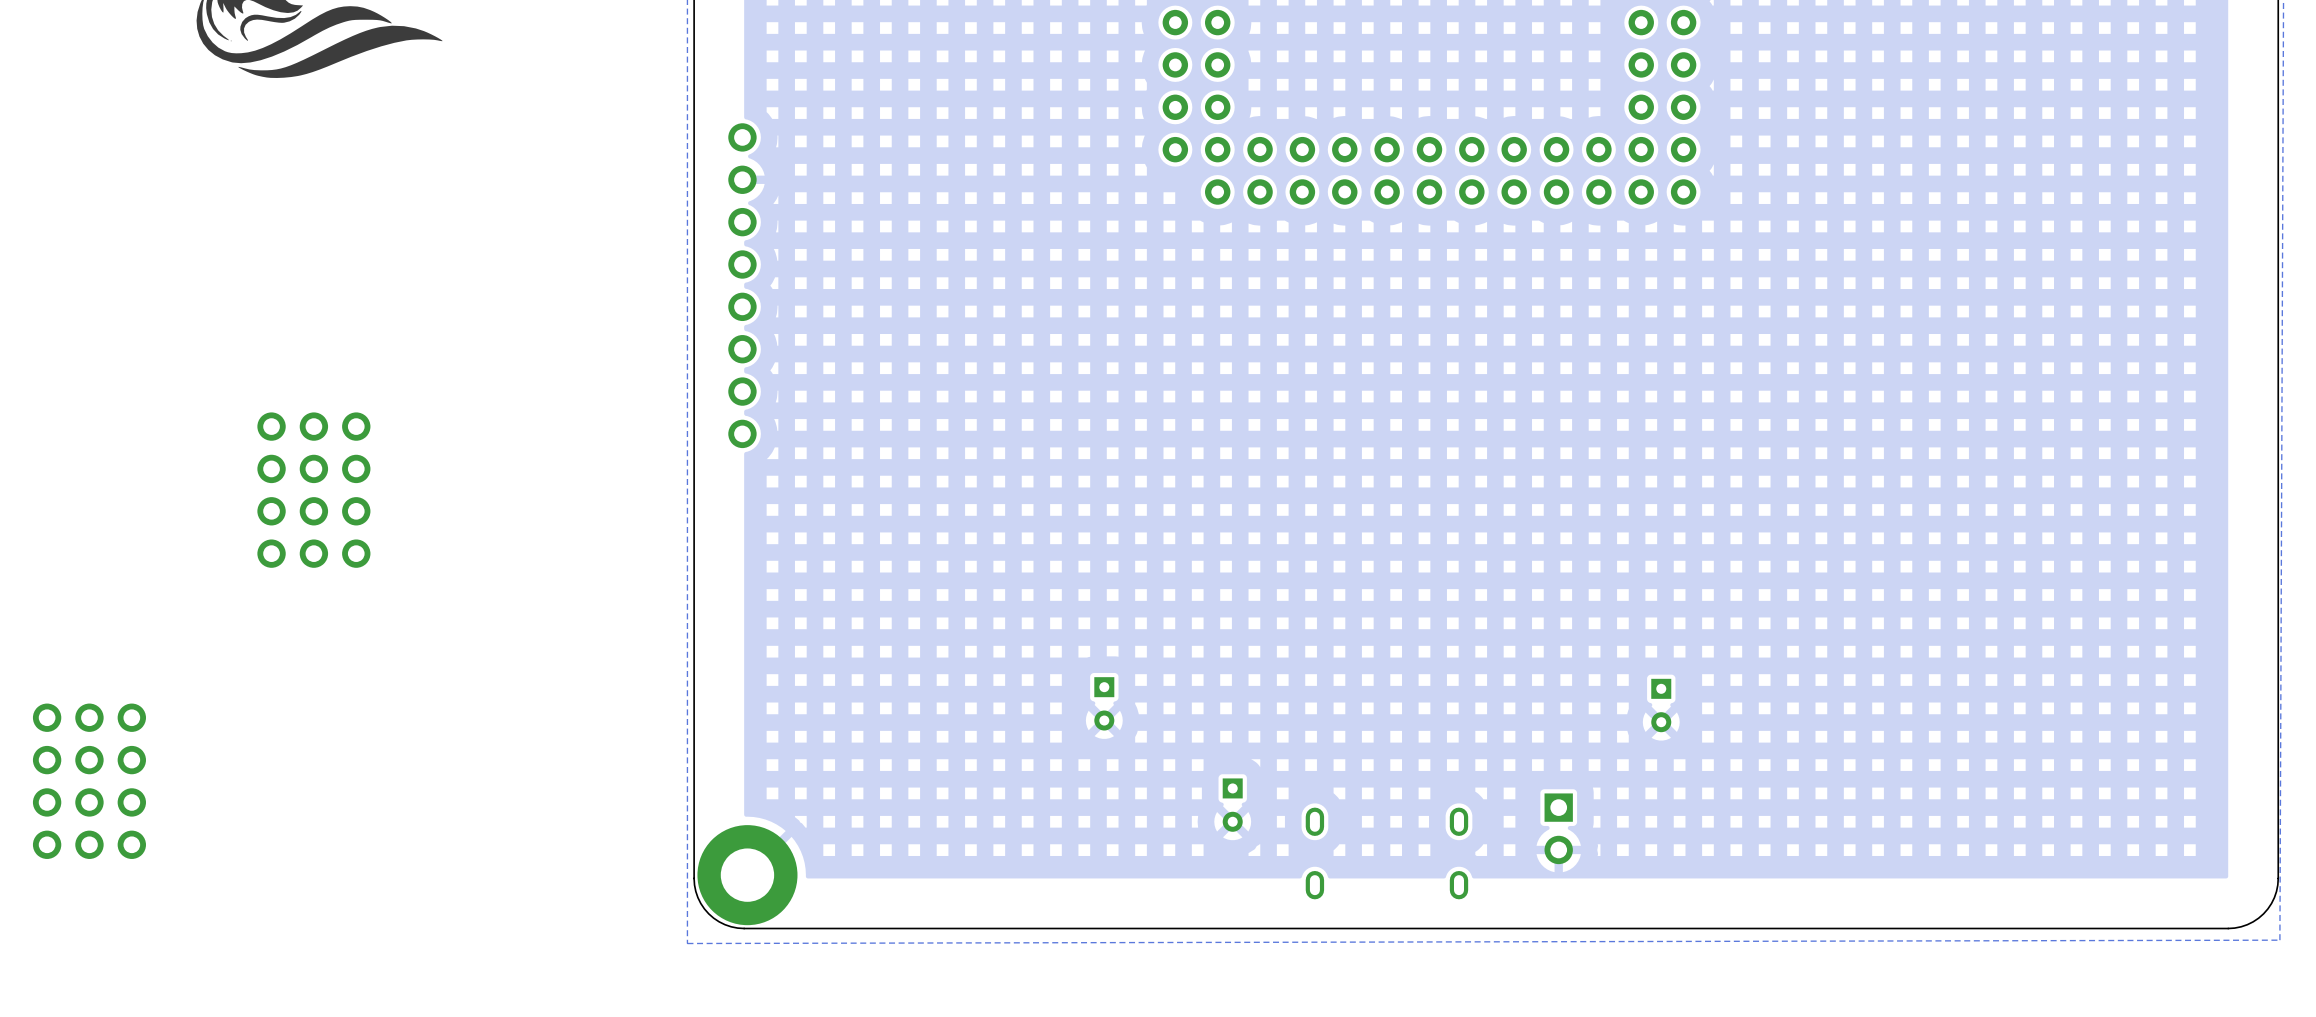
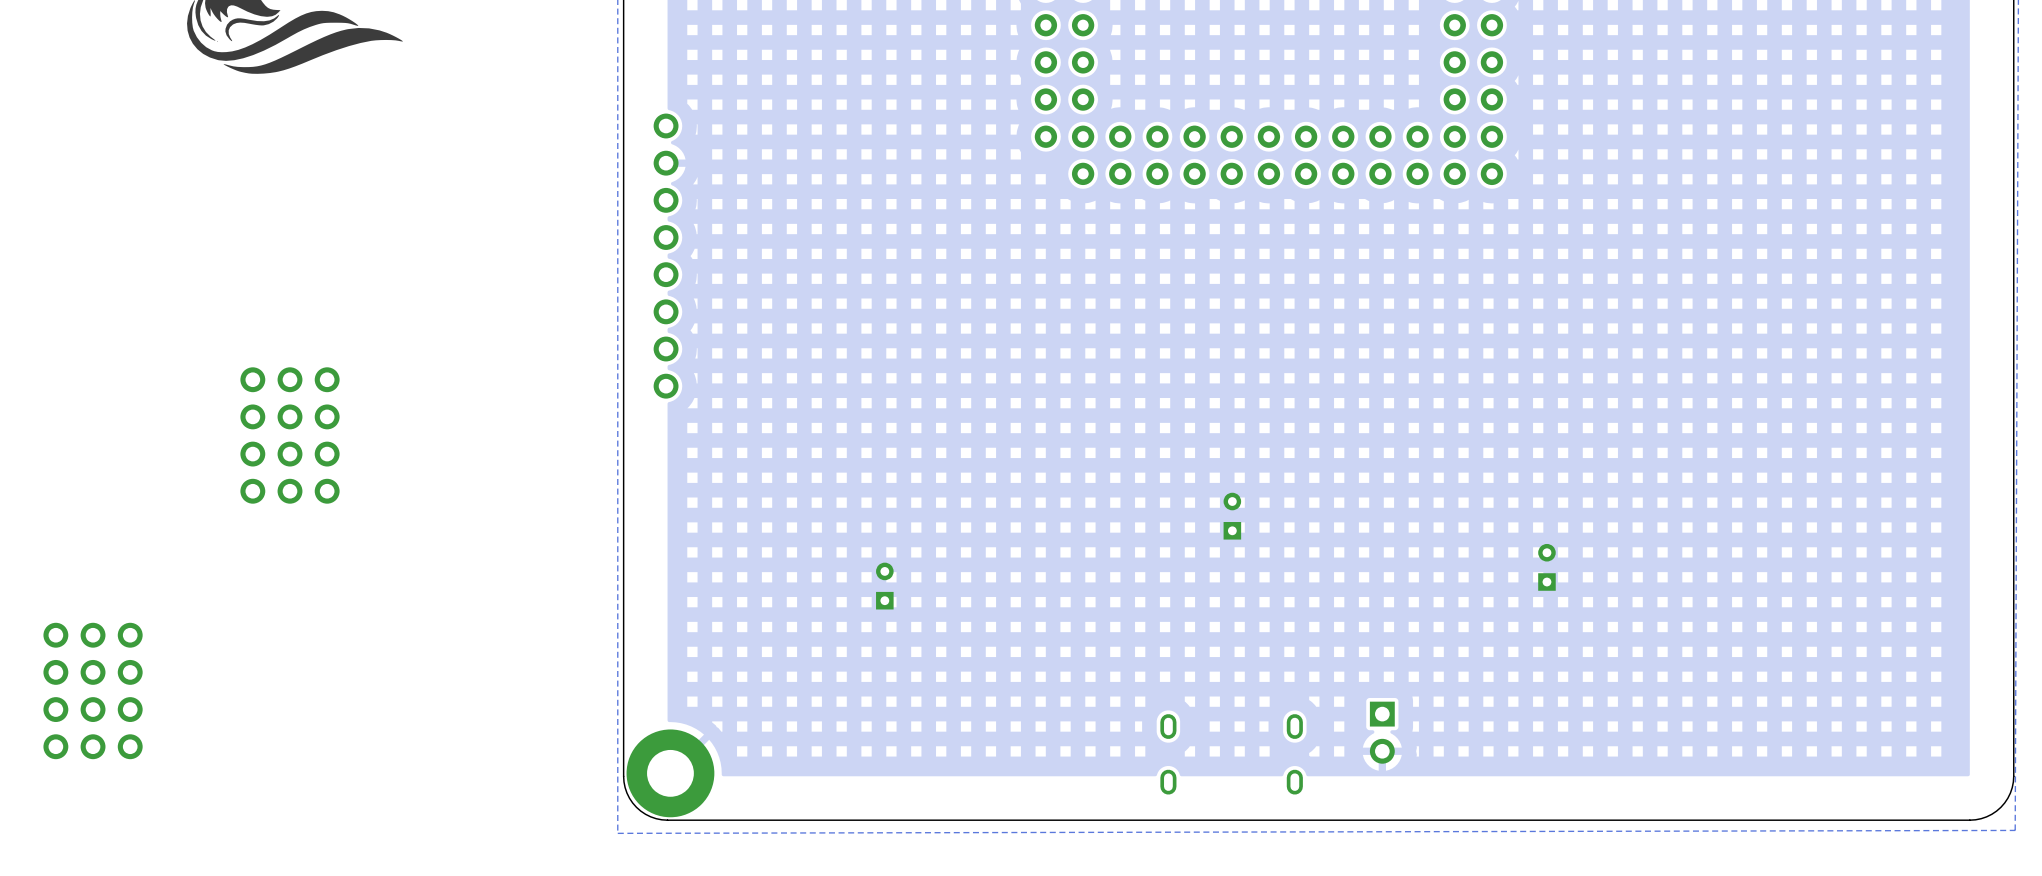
part: none -> (1232, 516)
part rotation: 0° (1104, 703) -> 180° (884, 586)
part position: (1104, 703) -> (884, 586)
part rotation: 0° (1661, 705) -> 180° (1546, 567)
part position: (1661, 705) -> (1546, 567)
part: (1232, 805) -> none

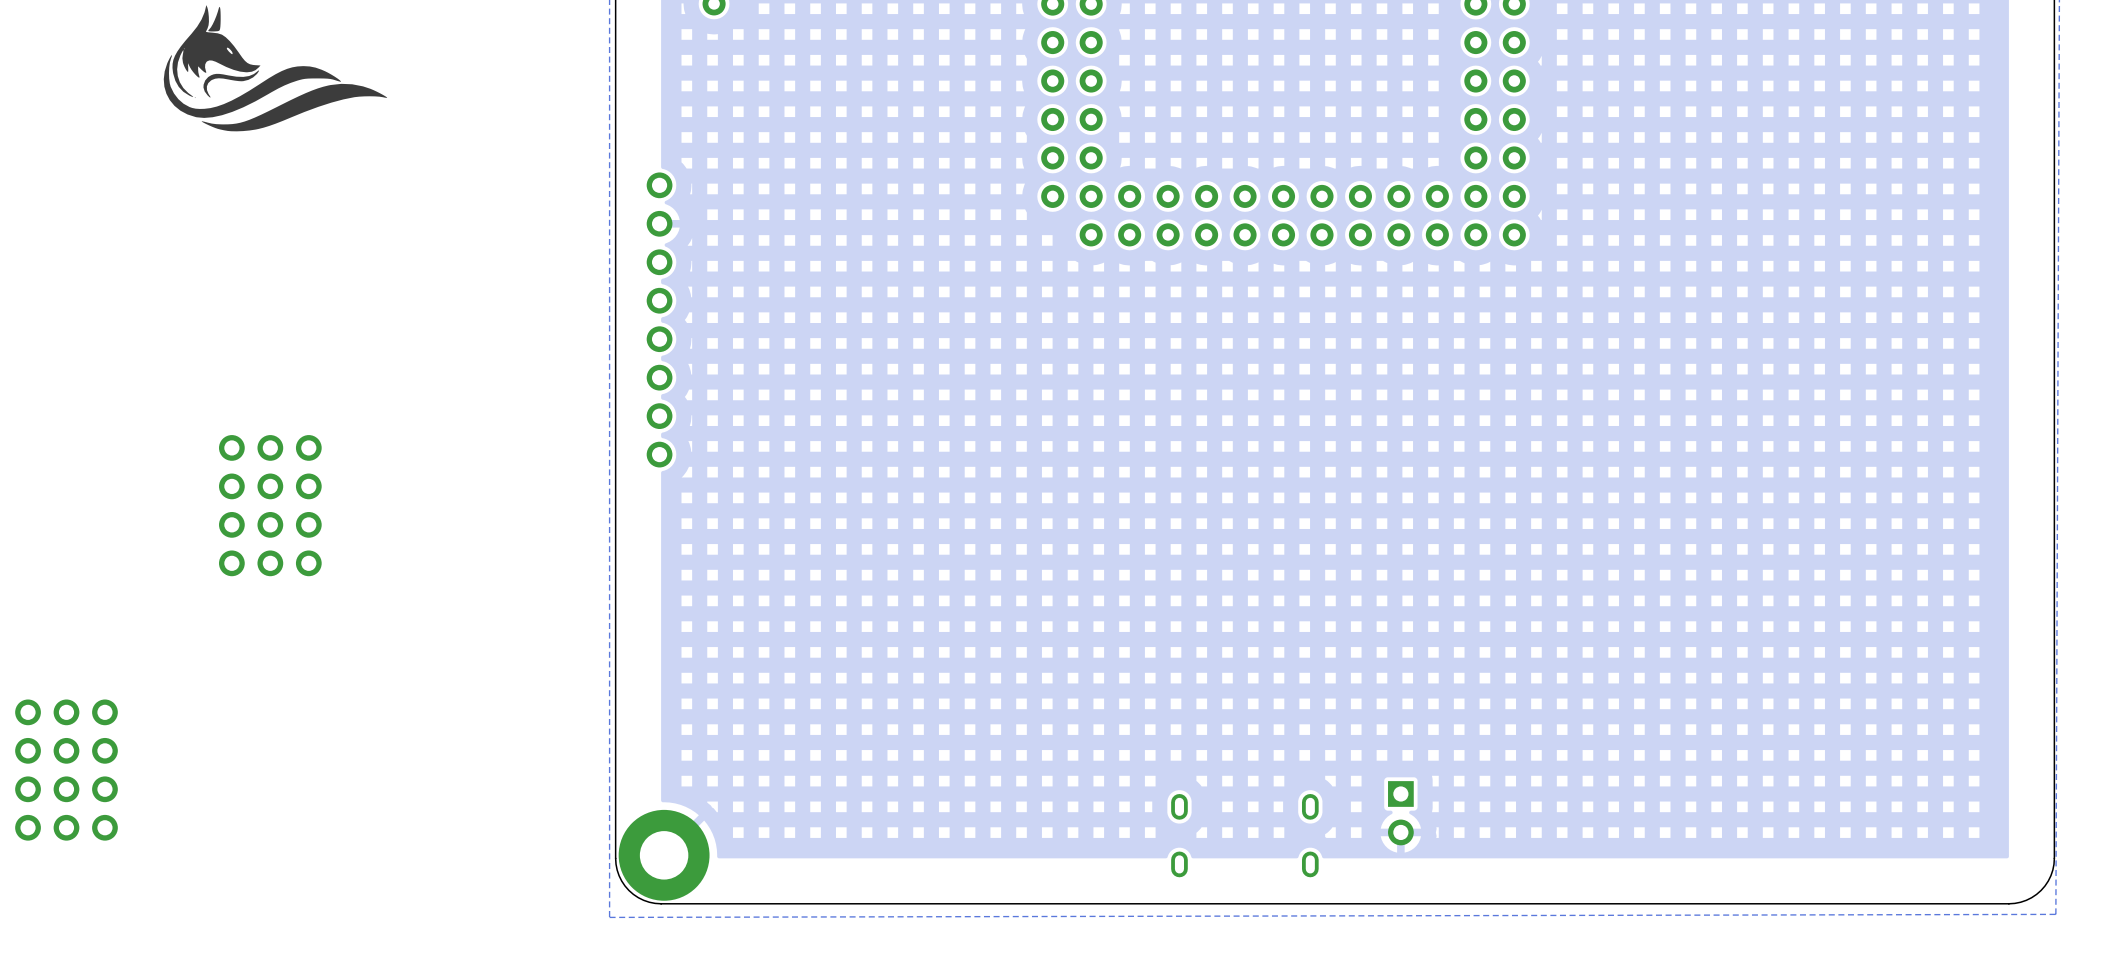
part: (1232, 516) -> none
part: (1546, 567) -> none
part: (884, 586) -> none

